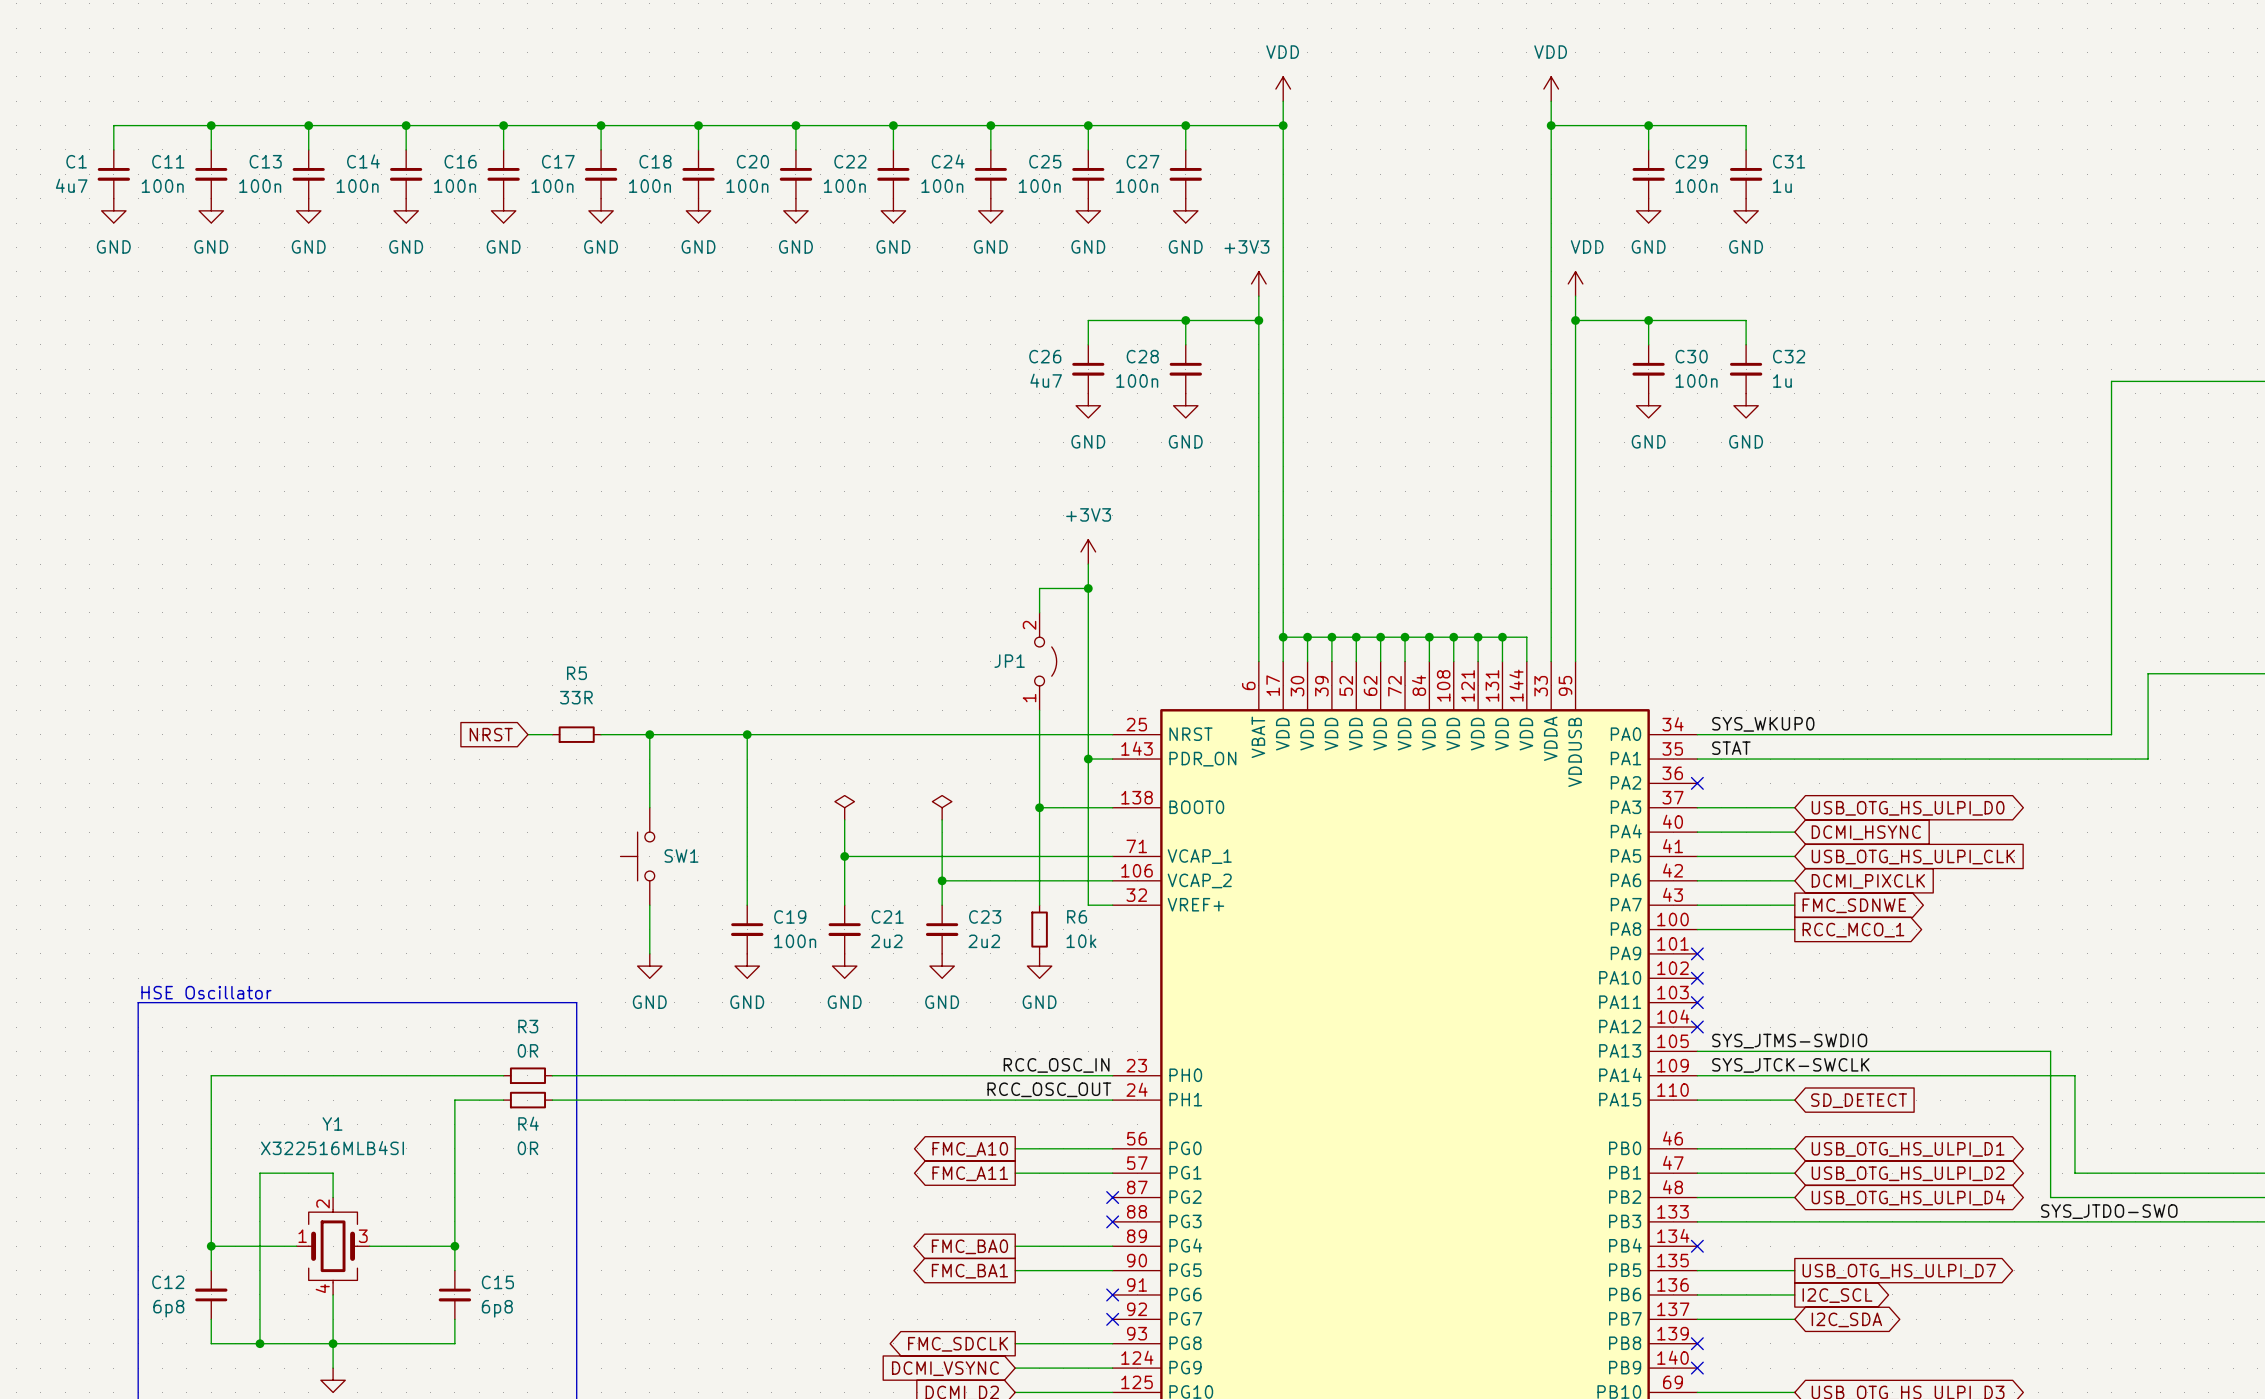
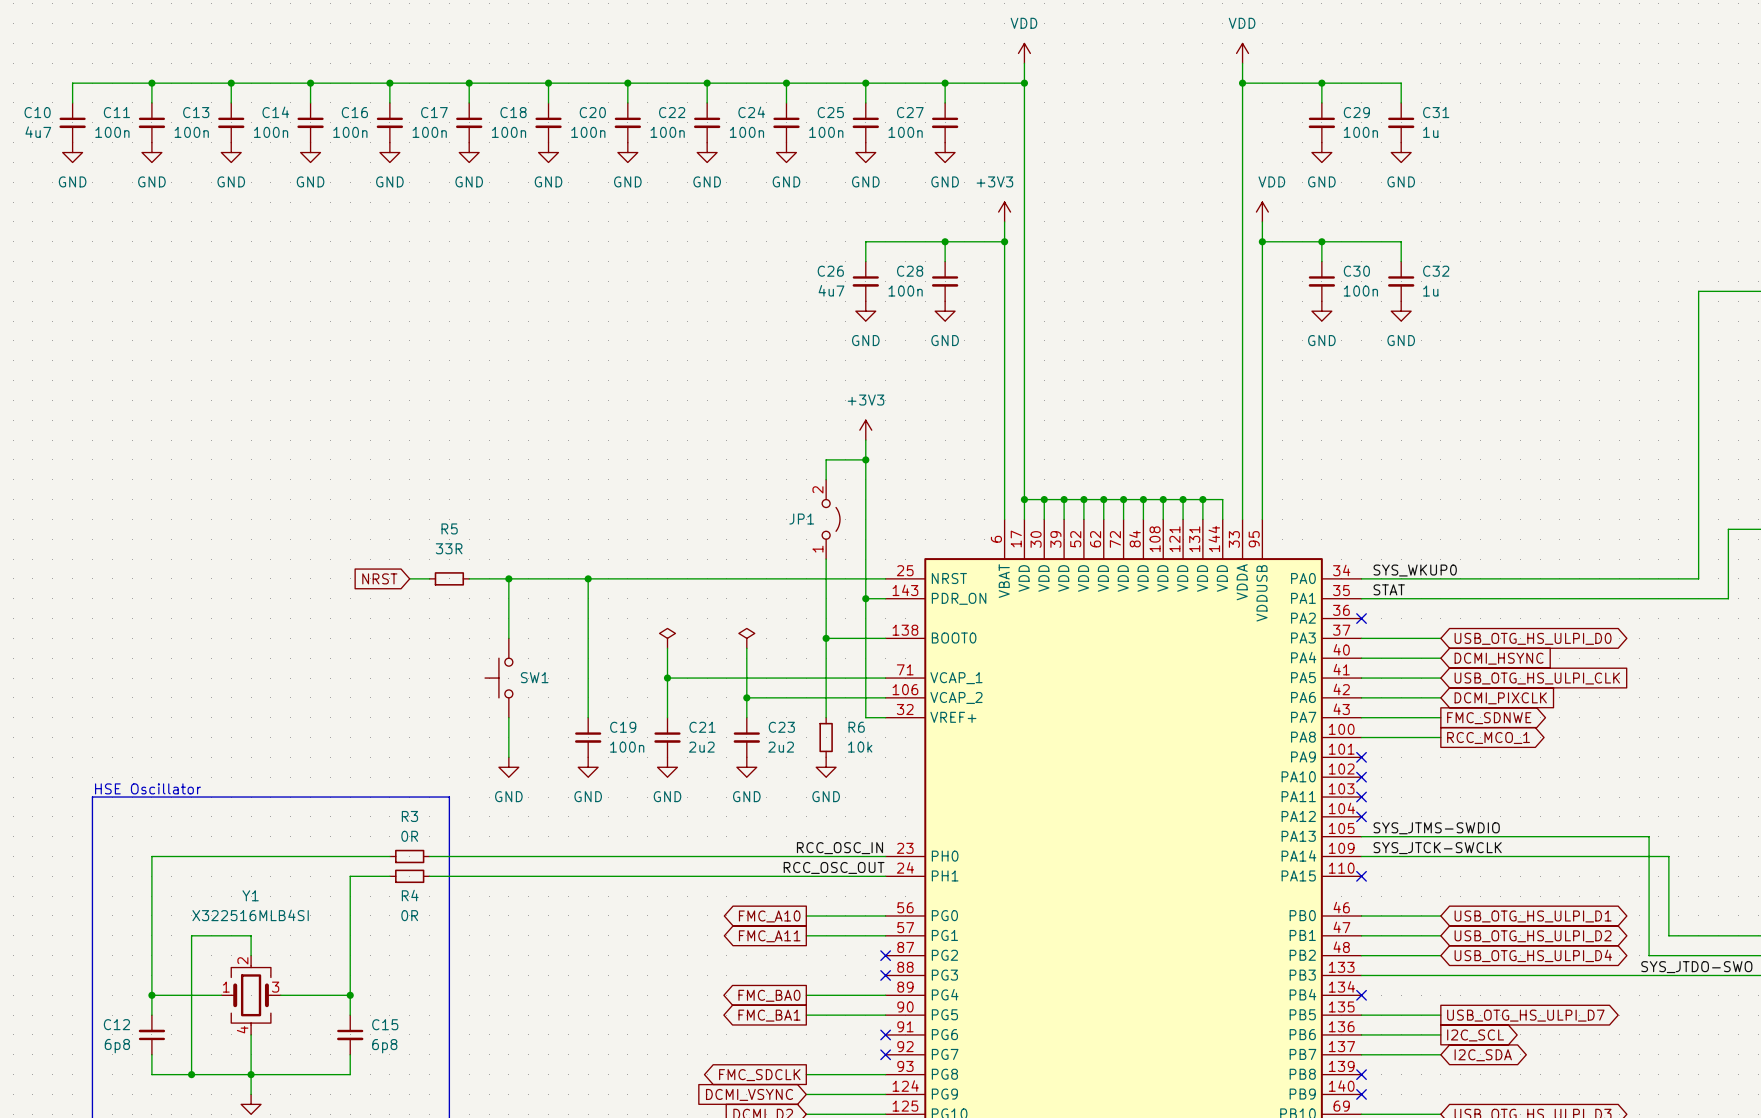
C1 name: C1 (76, 161) -> C10 (37, 112)
wire: (1697, 1100) (1794, 1100) -> none
no-connect mark: none -> (1361, 876)
global label: SD_DETECT (1859, 1100) -> none

